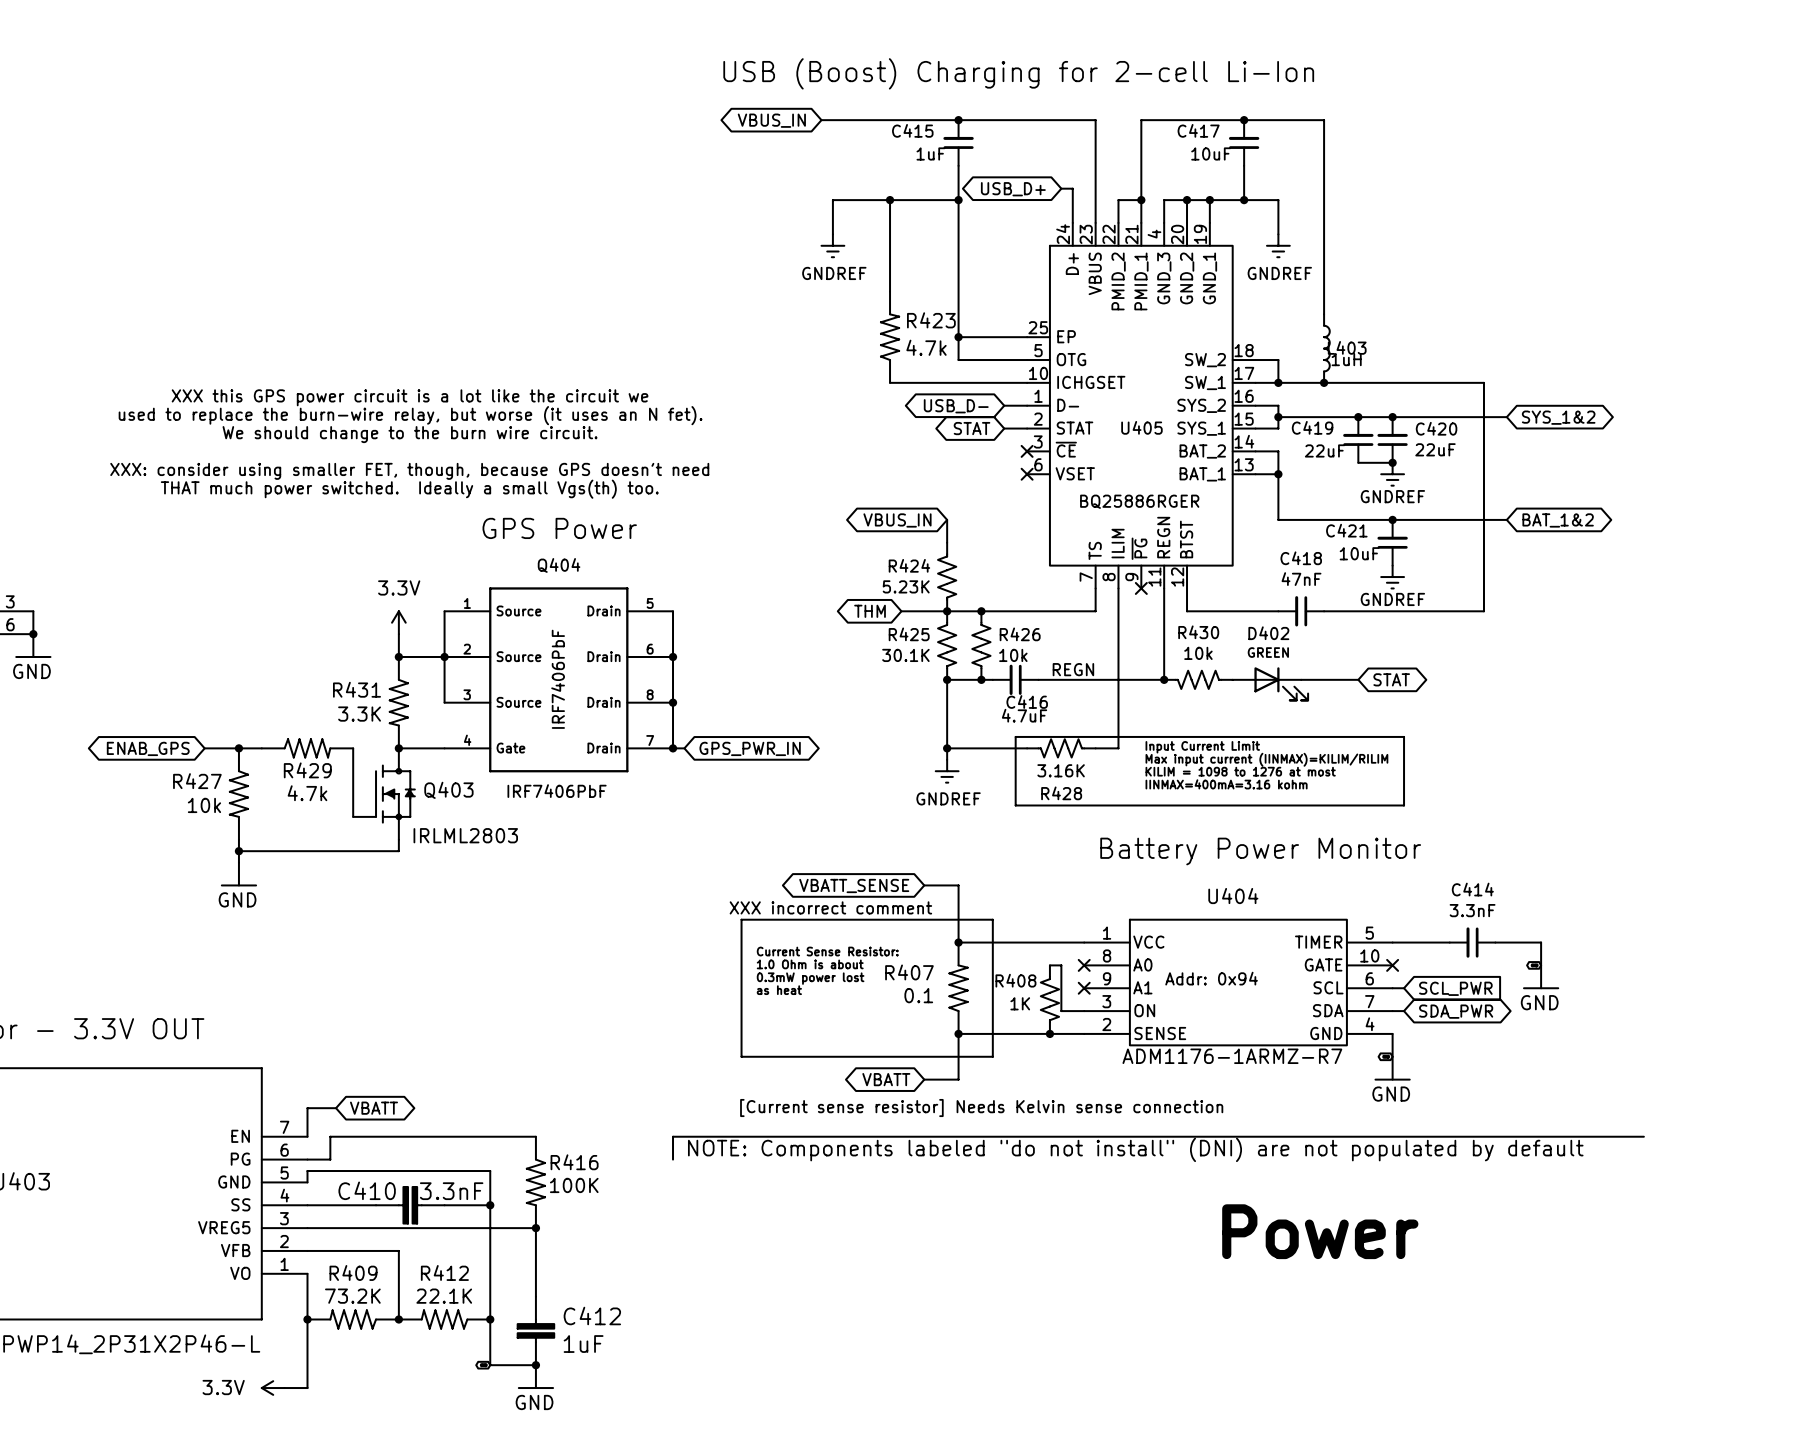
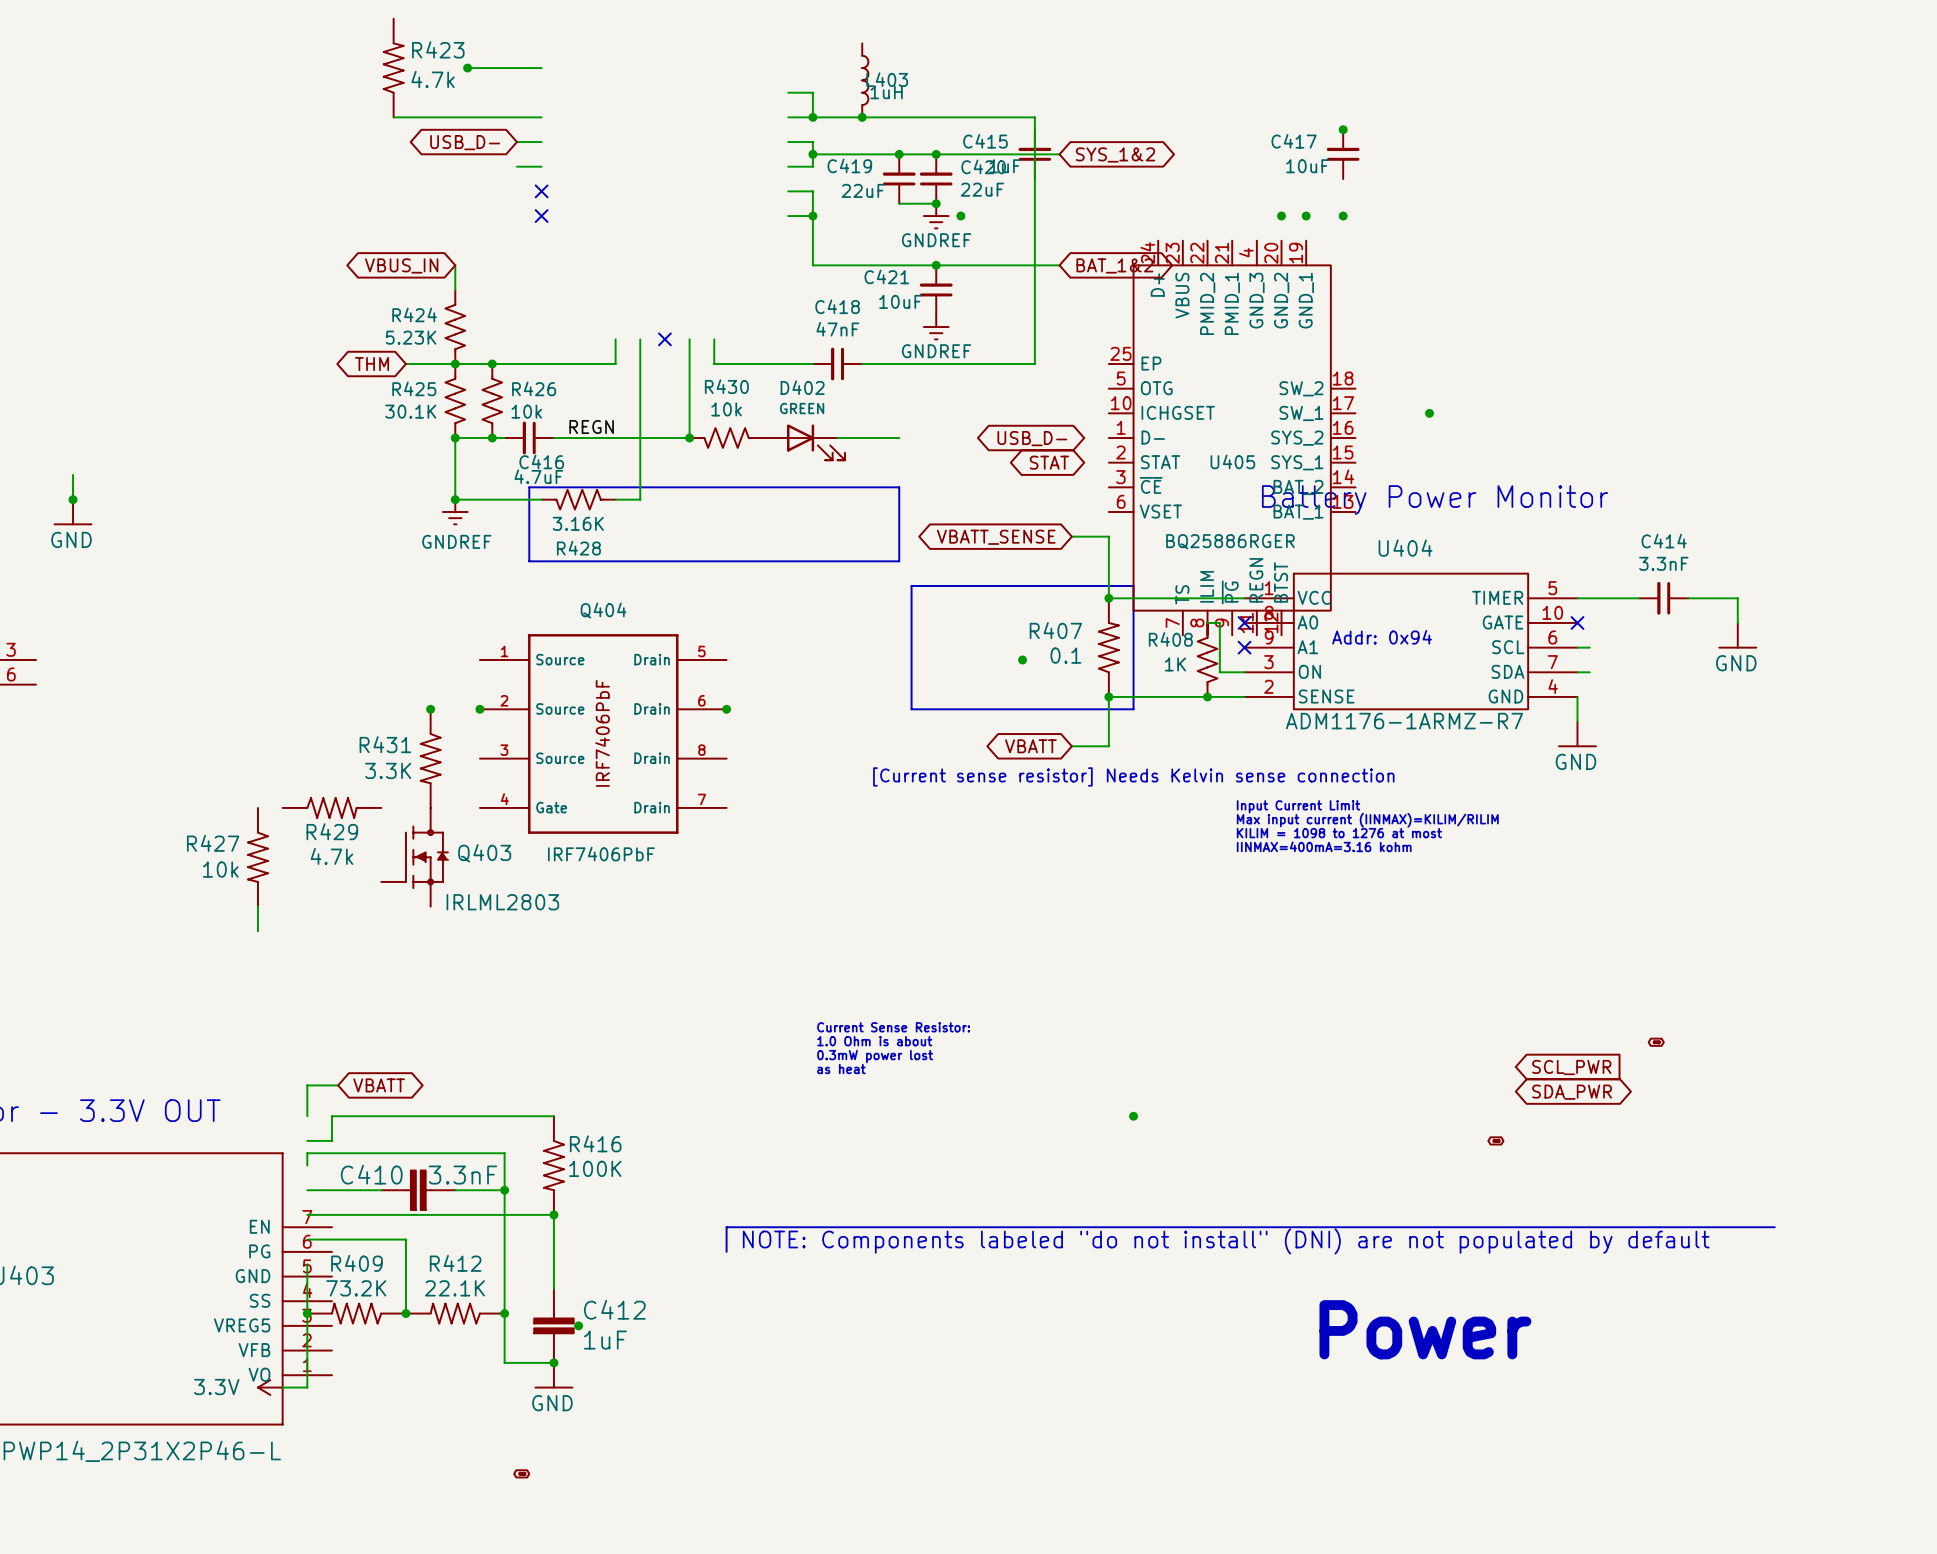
wire: none -> (467, 68) (541, 68)
junction: none -> (467, 68)
text: USB (Boost) Charging for 2-cell Li-Ion (1018, 73) -> none
wire: none -> (788, 92) (812, 92) (812, 117)
wire: none -> (393, 117) (541, 117)
wire: none -> (788, 117) (1034, 117) (1034, 179)
junction: none -> (812, 117)
junction: none -> (862, 117)
global label: VBUS_IN (771, 120) -> none
wire: (821, 120) (1095, 120) (1095, 222) -> none
junction: (958, 120) -> none
wire: none -> (516, 142) (541, 142)
wire: none -> (788, 142) (812, 142) (812, 166) (788, 166)
global label: none -> USB_D- (465, 142)
wire: none -> (812, 154) (1059, 154)
junction: none -> (812, 154)
junction: none -> (899, 154)
junction: none -> (936, 154)
global label: none -> SYS_1&2 (1115, 154)
wire: none -> (516, 166) (541, 166)
wire: (1244, 165) (1244, 200) -> none
no-connect mark: none -> (541, 191)
wire: none -> (788, 191) (812, 191) (812, 265) (1059, 265)
wire: none -> (899, 203) (936, 203)
junction: none -> (936, 203)
wire: (1061, 188) (1072, 188) (1072, 222) -> none
global label: USB_D+ (1013, 189) -> none
no-connect mark: none -> (541, 216)
wire: none -> (788, 216) (812, 216)
junction: none -> (812, 216)
power symbol: none -> GNDREF (936, 216)
wire: (890, 200) (890, 291) -> none
wire: (958, 200) (832, 200) (832, 234) -> none
junction: (958, 200) -> none
wire: (1141, 200) (1118, 200) (1118, 222) -> none
junction: (1141, 200) -> none
wire: (1187, 200) (1187, 222) -> none
wire: (1209, 200) (1209, 222) -> none
wire: (1141, 222) (1141, 120) (1324, 120) (1324, 314) -> none
wire: (1164, 222) (1164, 200) (1278, 200) (1278, 234) -> none
wire: none -> (455, 265) (455, 290)
power symbol: GNDREF (832, 245) -> none
junction: none -> (936, 265)
power symbol: GNDREF (1278, 245) -> none
global label: none -> VBUS_IN (401, 265)
global label: none -> BAT_1&2 (1114, 265)
power symbol: none -> GNDREF (936, 327)
wire: none -> (615, 339) (615, 364) (405, 364)
wire: none -> (640, 339) (640, 499) (615, 499)
no-connect mark: none -> (664, 339)
wire: none -> (689, 339) (689, 438) (553, 438)
wire: none -> (714, 339) (714, 364) (812, 364)
global label: none -> THM (372, 364)
junction: none -> (455, 364)
junction: none -> (492, 364)
wire: none -> (862, 364) (1034, 364)
R423 position: (890, 337) -> (393, 68)
junction: (958, 337) -> none
wire: (1027, 337) (958, 337) (958, 360) (1027, 360) -> none
L403 position: (1326, 348) -> (865, 80)
wire: (1255, 360) (1278, 360) (1278, 382) -> none
wire: (890, 382) (1027, 382) -> none
wire: (1255, 382) (1483, 382) (1483, 611) (1324, 611) -> none
junction: (1278, 382) -> none
label: none -> REGN (591, 427)
text: XXX this GPS power circuit is a lot like the circuit we (410, 397) -> none
junction: none -> (455, 438)
junction: none -> (492, 438)
wire: none -> (504, 438) (455, 438) (455, 499) (541, 499)
junction: none -> (689, 438)
wire: none -> (837, 438) (899, 438)
wire: (1004, 405) (1027, 405) -> none
wire: (1255, 405) (1278, 405) (1278, 428) (1255, 428) -> none
text: used to replace the burn-wire relay, but worse (it uses an N fet). (410, 415) -> none
wire: (1278, 417) (1506, 417) -> none
junction: (1278, 417) -> none
junction: (1358, 417) -> none
junction: (1392, 417) -> none
global label: SYS_1&2 (1558, 417) -> none
wire: (1004, 428) (1027, 428) -> none
text: We should change to the burn wire circuit. (410, 434) -> none
C419 position: (1358, 439) -> (899, 179)
C420 position: (1392, 439) -> (936, 179)
line: none -> (529, 487) (899, 487) (899, 561) (529, 561) (529, 487)
no-connect mark: (1027, 451) -> none
wire: (1255, 451) (1278, 451) (1278, 519) (1506, 519) -> none
junction: none -> (73, 499)
junction: none -> (455, 499)
wire: (1358, 462) (1392, 462) -> none
junction: (1392, 462) -> none
text: none -> Battery Power Monitor (1435, 500)
text: XXX: consider using smaller FET, though, because GPS doesn't need (409, 471) -> none
power symbol: none -> GNDREF (455, 511)
no-connect mark: (1027, 474) -> none
wire: (1255, 474) (1278, 474) -> none
junction: (1278, 474) -> none
power symbol: GNDREF (1392, 474) -> none
text: THAT much power switched. Ideally a small Vgs(th) too. (409, 489) -> none
global label: none -> VBATT_SENSE (996, 537)
wire: none -> (1071, 536) (1108, 536) (1108, 598) (1244, 598)
wire: (947, 519) (947, 542) -> none
junction: (1392, 519) -> none
global label: VBUS_IN (897, 520) -> none
global label: BAT_1&2 (1558, 520) -> none
text: GPS Power (559, 528) -> none
line: none -> (911, 585) (1133, 585) (1133, 709) (911, 709) (911, 585)
C421 position: (1392, 542) -> (936, 290)
junction: none -> (1108, 598)
wire: none -> (1688, 598) (1737, 598) (1737, 622)
R424 position: (947, 577) -> (455, 327)
wire: none -> (1207, 622) (1219, 622) (1219, 672) (1244, 672)
no-connect mark: none -> (1244, 622)
power symbol: GNDREF (1392, 577) -> none
no-connect mark: none -> (1577, 622)
wire: (1095, 588) (1095, 611) (901, 611) -> none
wire: (1118, 588) (1118, 748) (1095, 748) -> none
no-connect mark: (1141, 588) -> none
wire: (1164, 588) (1164, 679) (1038, 679) -> none
wire: (1187, 588) (1187, 611) (1278, 611) -> none
power symbol: none -> GND (1737, 635)
text: none -> Addr: 0x94 (1382, 637)
no-connect mark: none -> (1244, 647)
wire: none -> (1577, 647) (1589, 647)
wire: (33, 611) (33, 634) -> (73, 475) (73, 499)
wire: (444, 611) (444, 702) -> none
wire: (673, 611) (673, 748) (684, 748) -> none
global label: THM (870, 611) -> none
junction: (981, 611) -> none
C418 position: (1301, 611) -> (837, 364)
power symbol: 3.3V (398, 622) -> none
wire: none -> (1577, 672) (1589, 672)
junction: (33, 634) -> none
wire: (398, 634) (398, 656) (444, 656) -> none
power symbol position: GND (33, 645) -> GND (73, 511)
R425 position: (947, 645) -> (455, 401)
R426 position: (981, 645) -> (492, 401)
junction: none -> (1108, 696)
junction: none -> (1207, 696)
wire: none -> (1244, 696) (1108, 696) (1108, 746) (1071, 746)
wire: none -> (1577, 696) (1577, 721)
label: REGN (1073, 669) -> none
junction: (947, 679) -> none
junction: (981, 679) -> none
wire: (992, 679) (947, 679) (947, 759) -> none
C416 position: (1015, 679) -> (529, 438)
junction: (1164, 679) -> none
R430 position: (1198, 679) -> (726, 438)
wire: (1301, 679) (1358, 679) -> (1577, 598) (1639, 598)
global label: STAT (1391, 679) -> none
power symbol: none -> GND (1577, 733)
D402 position: (1270, 683) -> (804, 442)
global label: none -> VBATT (1030, 746)
junction: (673, 702) -> none
text: none -> [Current sense resistor] Needs Kelvin sense connection (1133, 776)
line: (1015, 736) (1404, 736) (1404, 805) (1015, 805) (1015, 736) -> none
global label: ENAB_GPS (148, 748) -> none
wire: (204, 748) (261, 748) -> none
junction: (238, 748) -> none
wire: (353, 748) (353, 816) -> none
wire: (398, 748) (444, 748) -> none
junction: (398, 748) -> none
junction: (673, 748) -> none
global label: GPS_PWR_IN (750, 748) -> none
wire: (947, 748) (1027, 748) -> none
junction: (947, 748) -> none
R428 position: (1061, 748) -> (578, 499)
power symbol: GNDREF (947, 771) -> none
wire: (398, 839) (398, 851) (238, 851) -> none
junction: (238, 851) -> none
text: Battery Power Monitor (1260, 851) -> none
power symbol: GND (238, 874) -> none
global label: VBATT_SENSE (854, 885) -> none
wire: (924, 885) (958, 885) (958, 942) (1084, 942) -> none
text: XXX incorrect comment (830, 907) -> none
line: (741, 919) (992, 919) (992, 1056) (741, 1056) (741, 919) -> none
junction: (958, 942) -> none
wire: (1392, 942) (1449, 942) -> none
C414 position: (1472, 942) -> (1663, 598)
wire: (1495, 942) (1541, 942) (1541, 965) -> none
wire: (1049, 965) (1061, 965) (1061, 1011) (1084, 1011) -> none
no-connect mark: (1084, 965) -> none
no-connect mark: (1392, 965) -> none
power symbol: GND (1541, 976) -> none
text: Addr: 0x94 (1211, 978) -> none
U404 position: (1238, 982) -> (1411, 641)
R407 position: (958, 988) -> (1108, 647)
no-connect mark: (1084, 988) -> none
wire: (1392, 988) (1404, 988) -> none
R408 position: (1049, 999) -> (1207, 659)
wire: (1392, 1011) (1404, 1011) -> none
junction: (958, 1033) -> none
wire: (1084, 1033) (958, 1033) (958, 1079) (924, 1079) -> none
wire: (1392, 1033) (1392, 1056) -> none
power symbol: GND (1392, 1068) -> none
global label: VBATT (886, 1079) -> none
junction: none -> (504, 1190)
wire: (336, 1108) (307, 1108) (307, 1136) -> (338, 1085) (307, 1085) (307, 1116)
global label position: VBATT (374, 1108) -> VBATT (379, 1085)
text: [Current sense resistor] Needs Kelvin sense connection (981, 1108) -> none
junction: none -> (553, 1214)
wire: (535, 1136) (330, 1136) (330, 1159) (307, 1159) -> (553, 1116) (331, 1116) (331, 1140) (307, 1140)
wire: (307, 1182) (307, 1171) (490, 1171) (490, 1365) (535, 1365) -> (307, 1165) (307, 1153) (504, 1153) (504, 1362) (553, 1362)
R416 position: (535, 1182) -> (553, 1165)
wire: (307, 1205) (376, 1205) -> (307, 1190) (381, 1190)
C410 position: (410, 1205) -> (418, 1190)
wire: (444, 1205) (490, 1205) -> (455, 1190) (504, 1190)
junction position: (490, 1205) -> (504, 1313)
junction: none -> (307, 1313)
junction: none -> (405, 1313)
wire: (307, 1228) (535, 1228) (535, 1296) -> (307, 1214) (553, 1214) (553, 1288)
wire: (307, 1250) (398, 1250) (398, 1319) -> (307, 1239) (405, 1239) (405, 1313)
junction: none -> (553, 1362)
wire: (307, 1273) (307, 1388) (284, 1388) -> (307, 1264) (307, 1387) (282, 1387)
junction: (307, 1319) -> none
R409 position: (353, 1319) -> (356, 1313)
junction: (398, 1319) -> none
R412 position: (444, 1319) -> (455, 1313)
junction: (490, 1319) -> none
C412 position: (535, 1330) -> (553, 1325)
junction: (535, 1365) -> none
power symbol position: GND (535, 1376) -> GND (553, 1375)
power symbol position: 3.3V (273, 1388) -> 3.3V (270, 1387)

